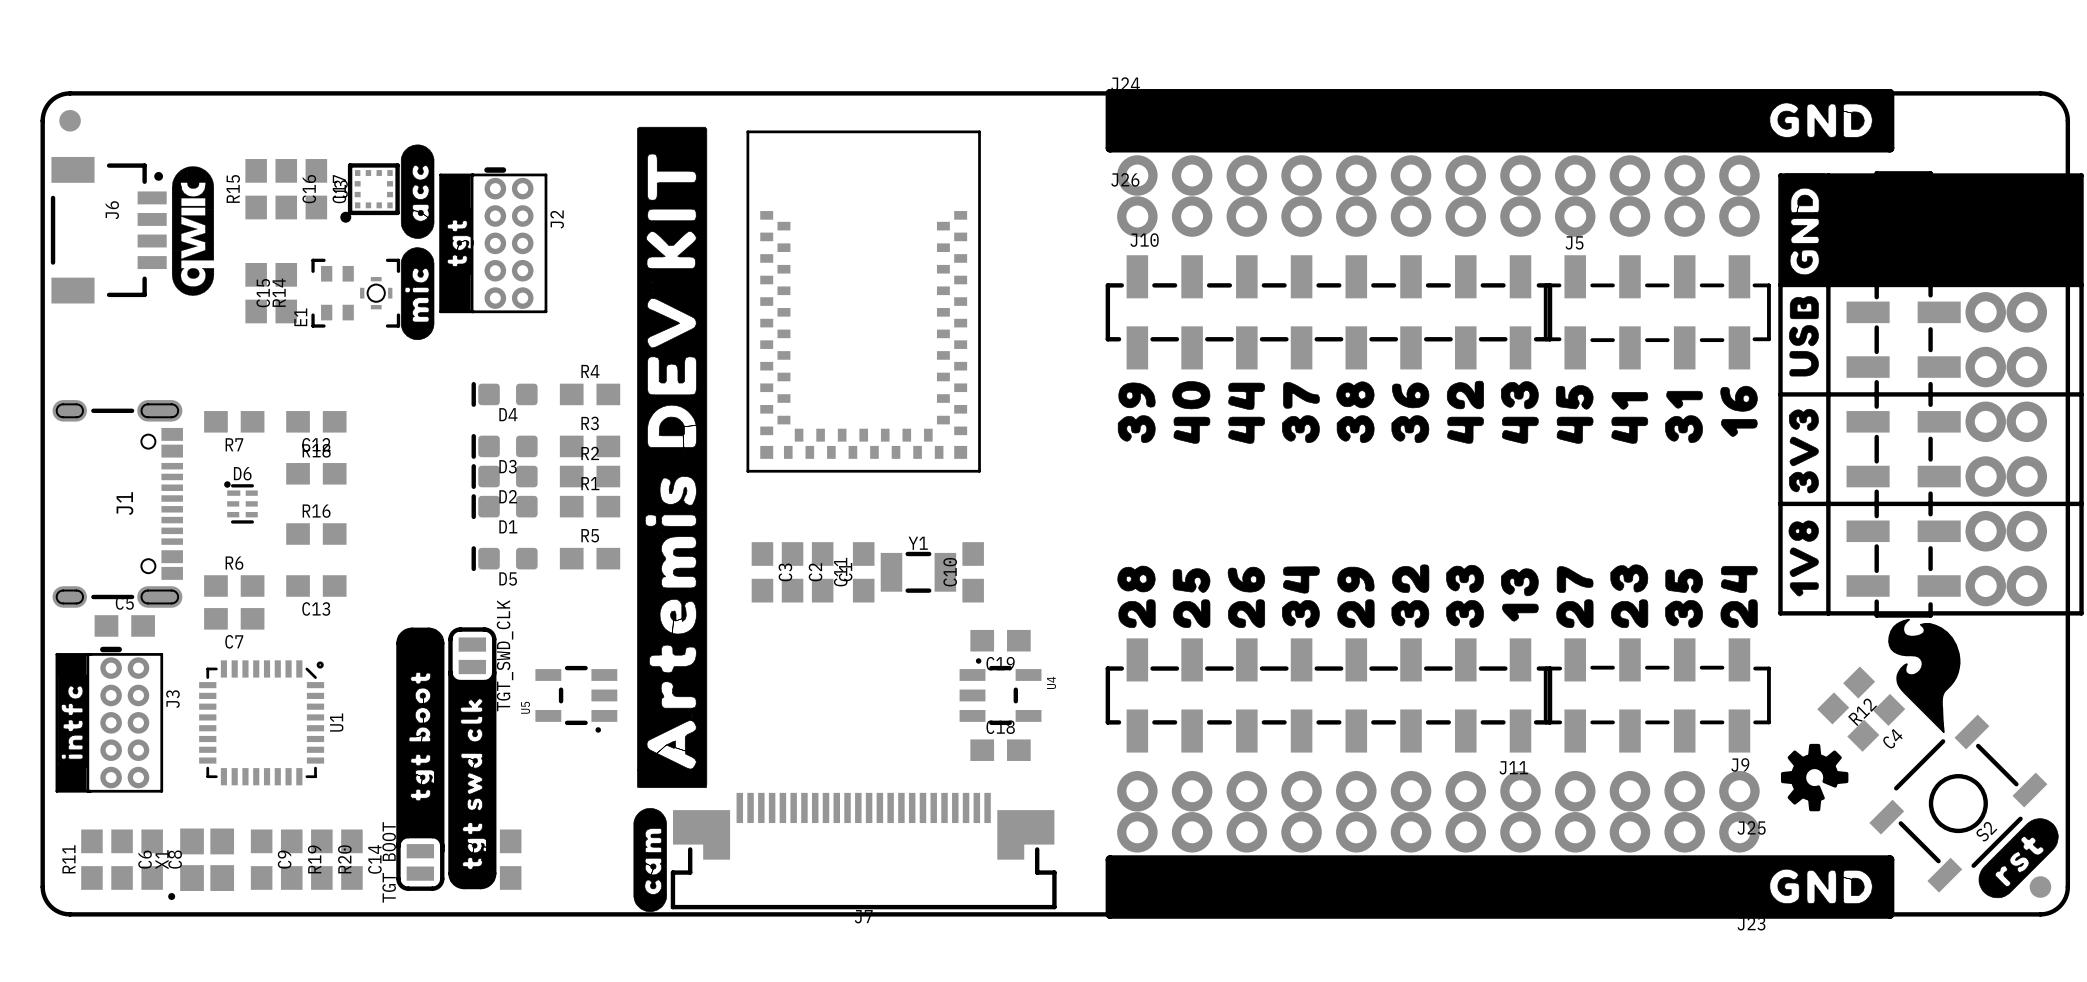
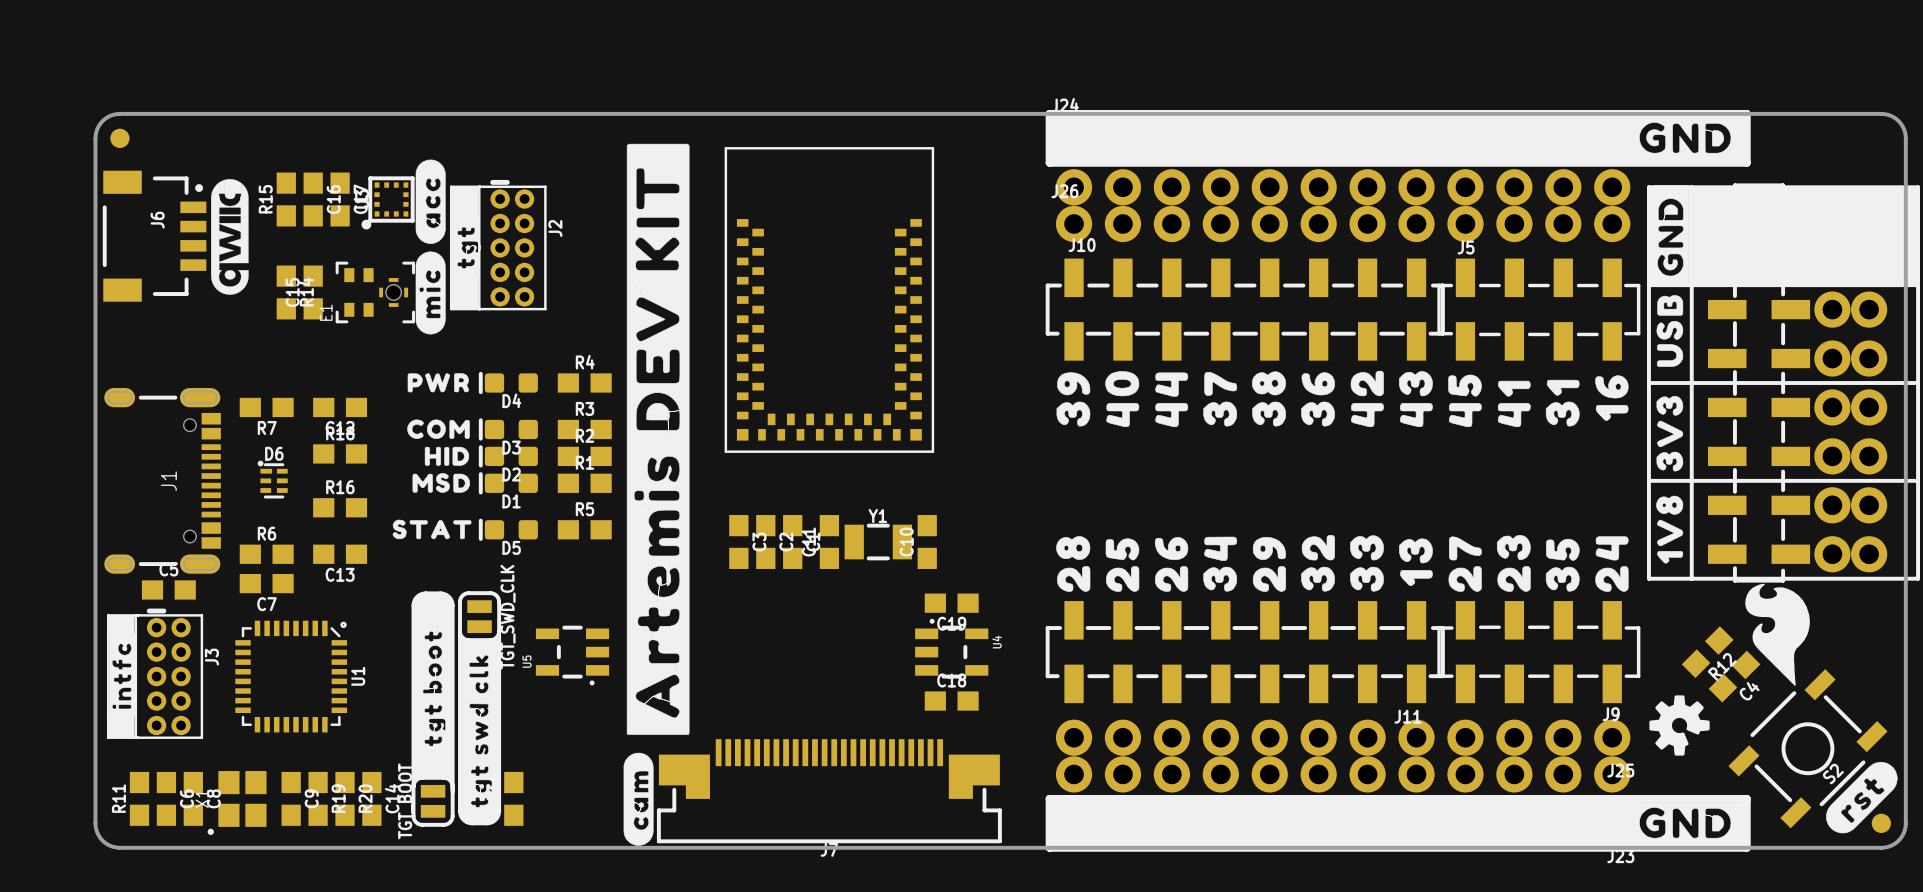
drawing: none -> [407, 373, 469, 393]
drawing: none -> [407, 419, 471, 493]
drawing: none -> [392, 519, 472, 540]

